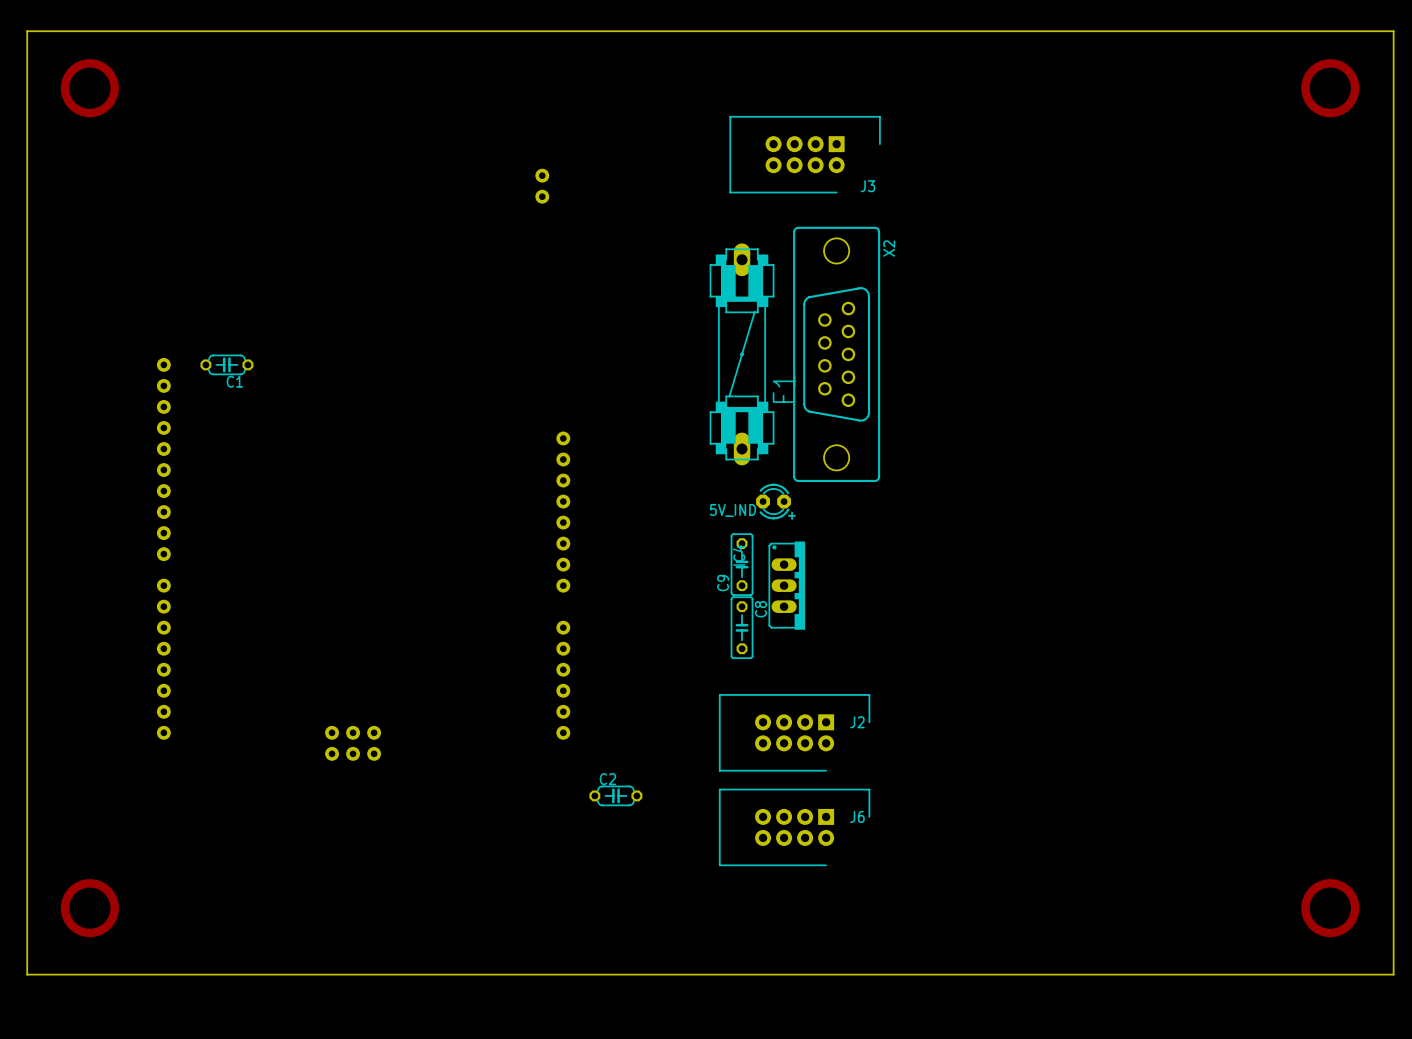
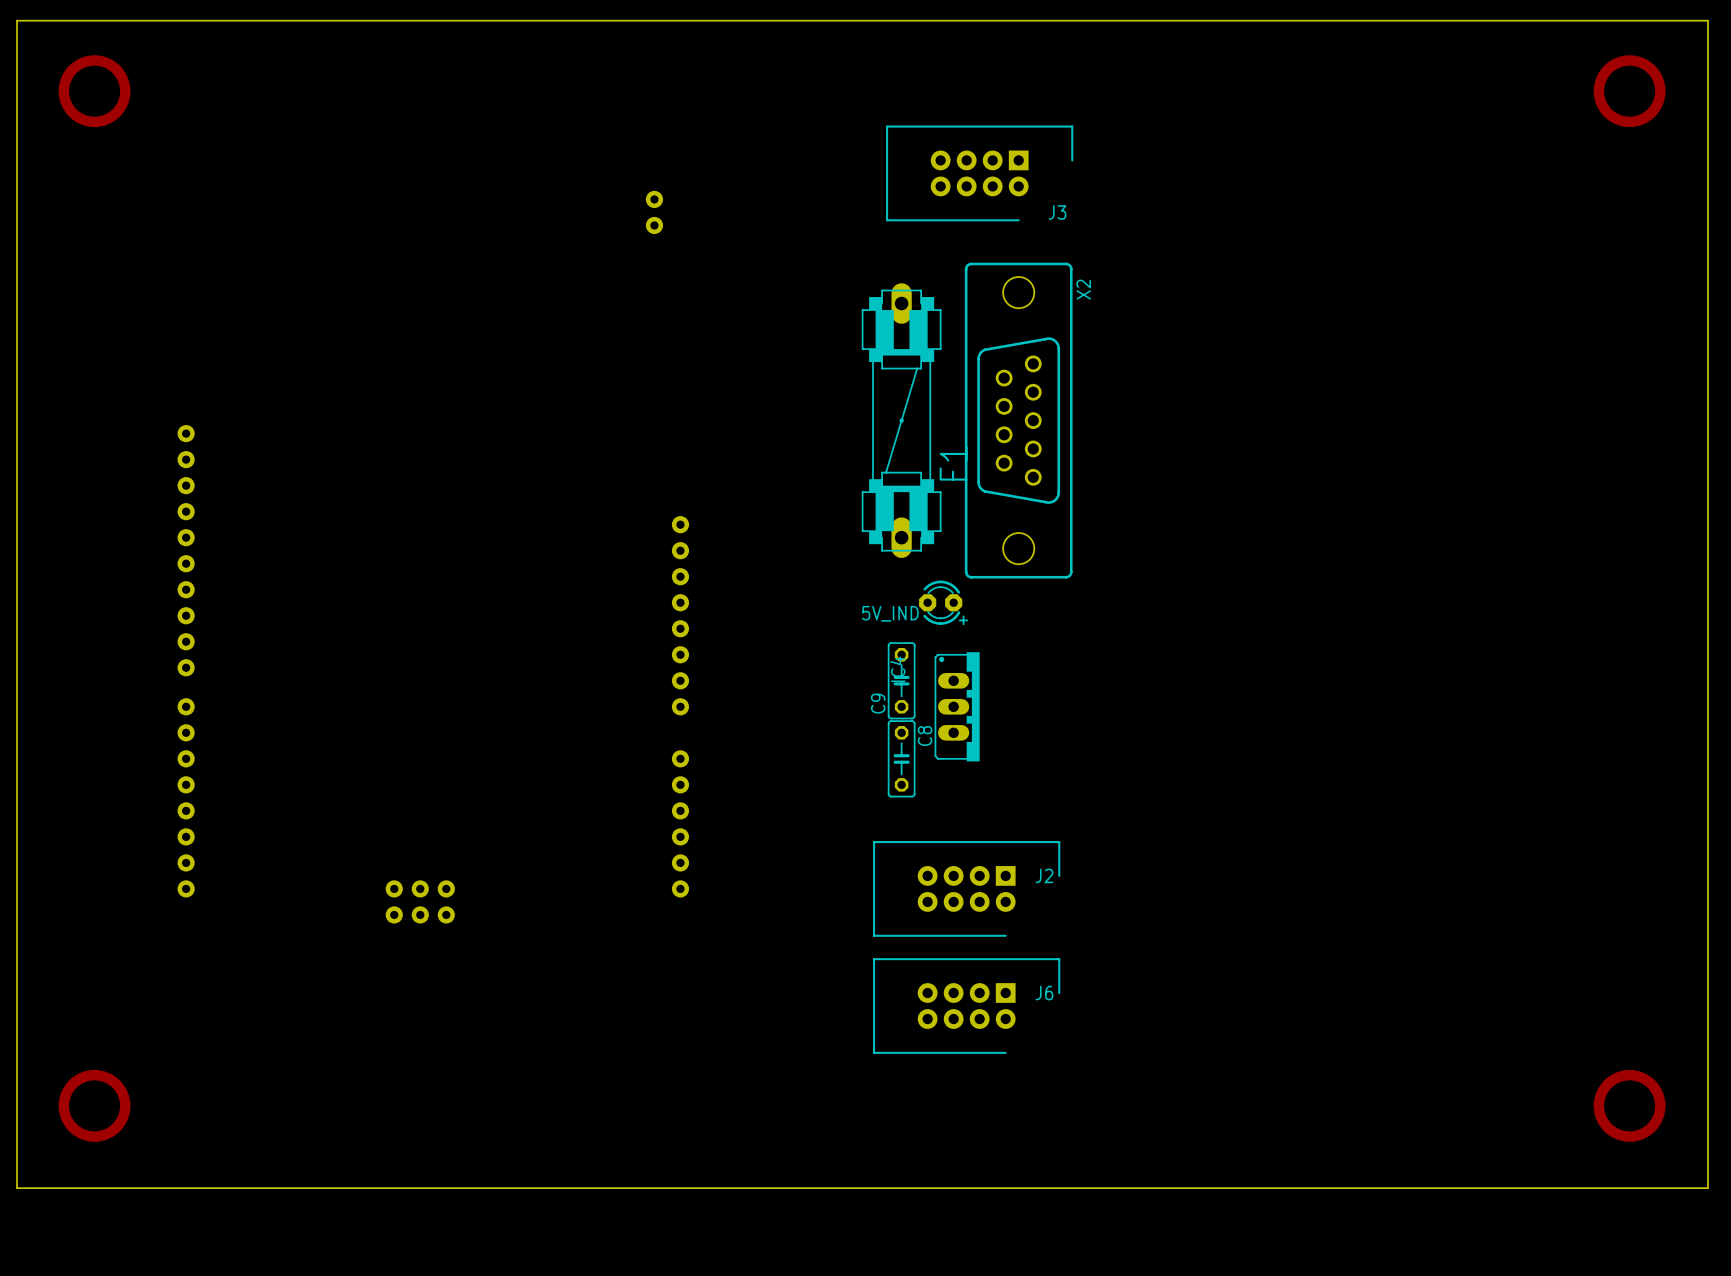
C1: (226, 364) -> none
C2: (615, 795) -> none

